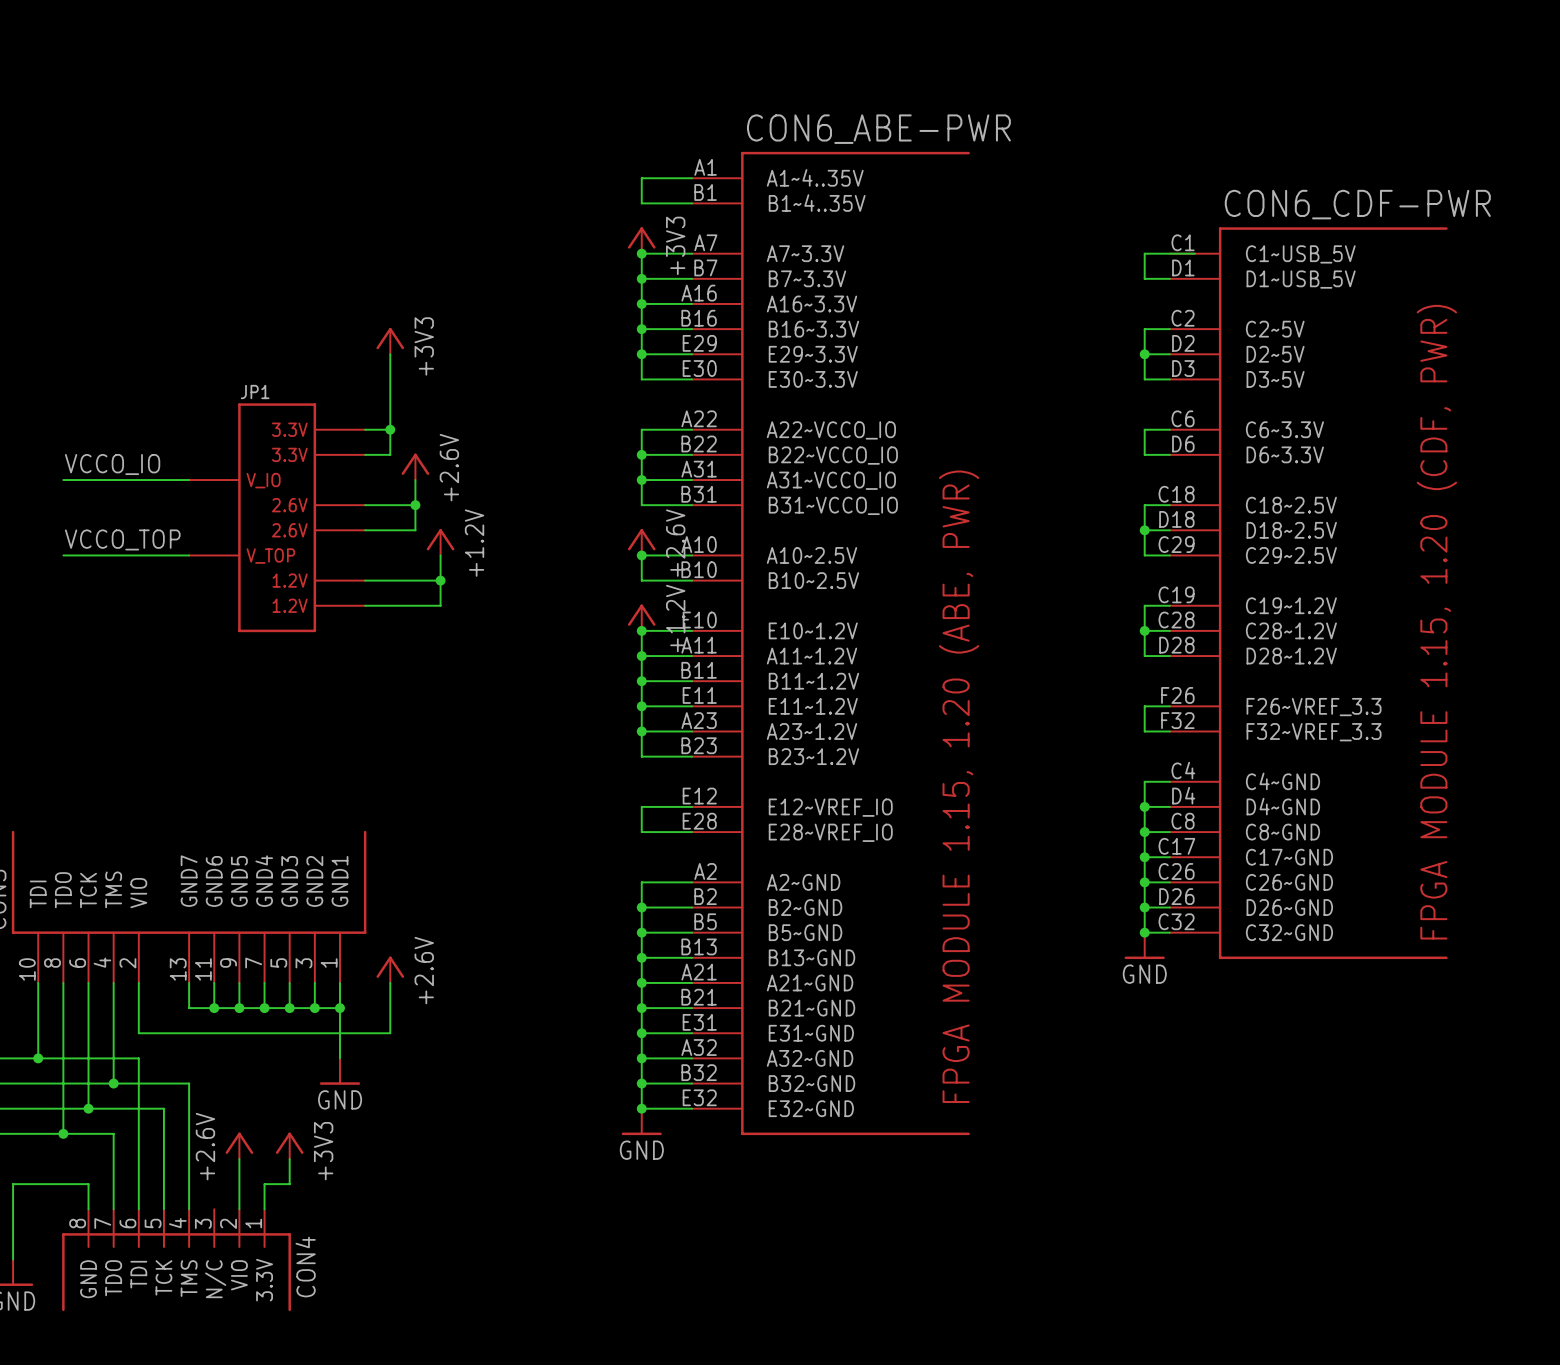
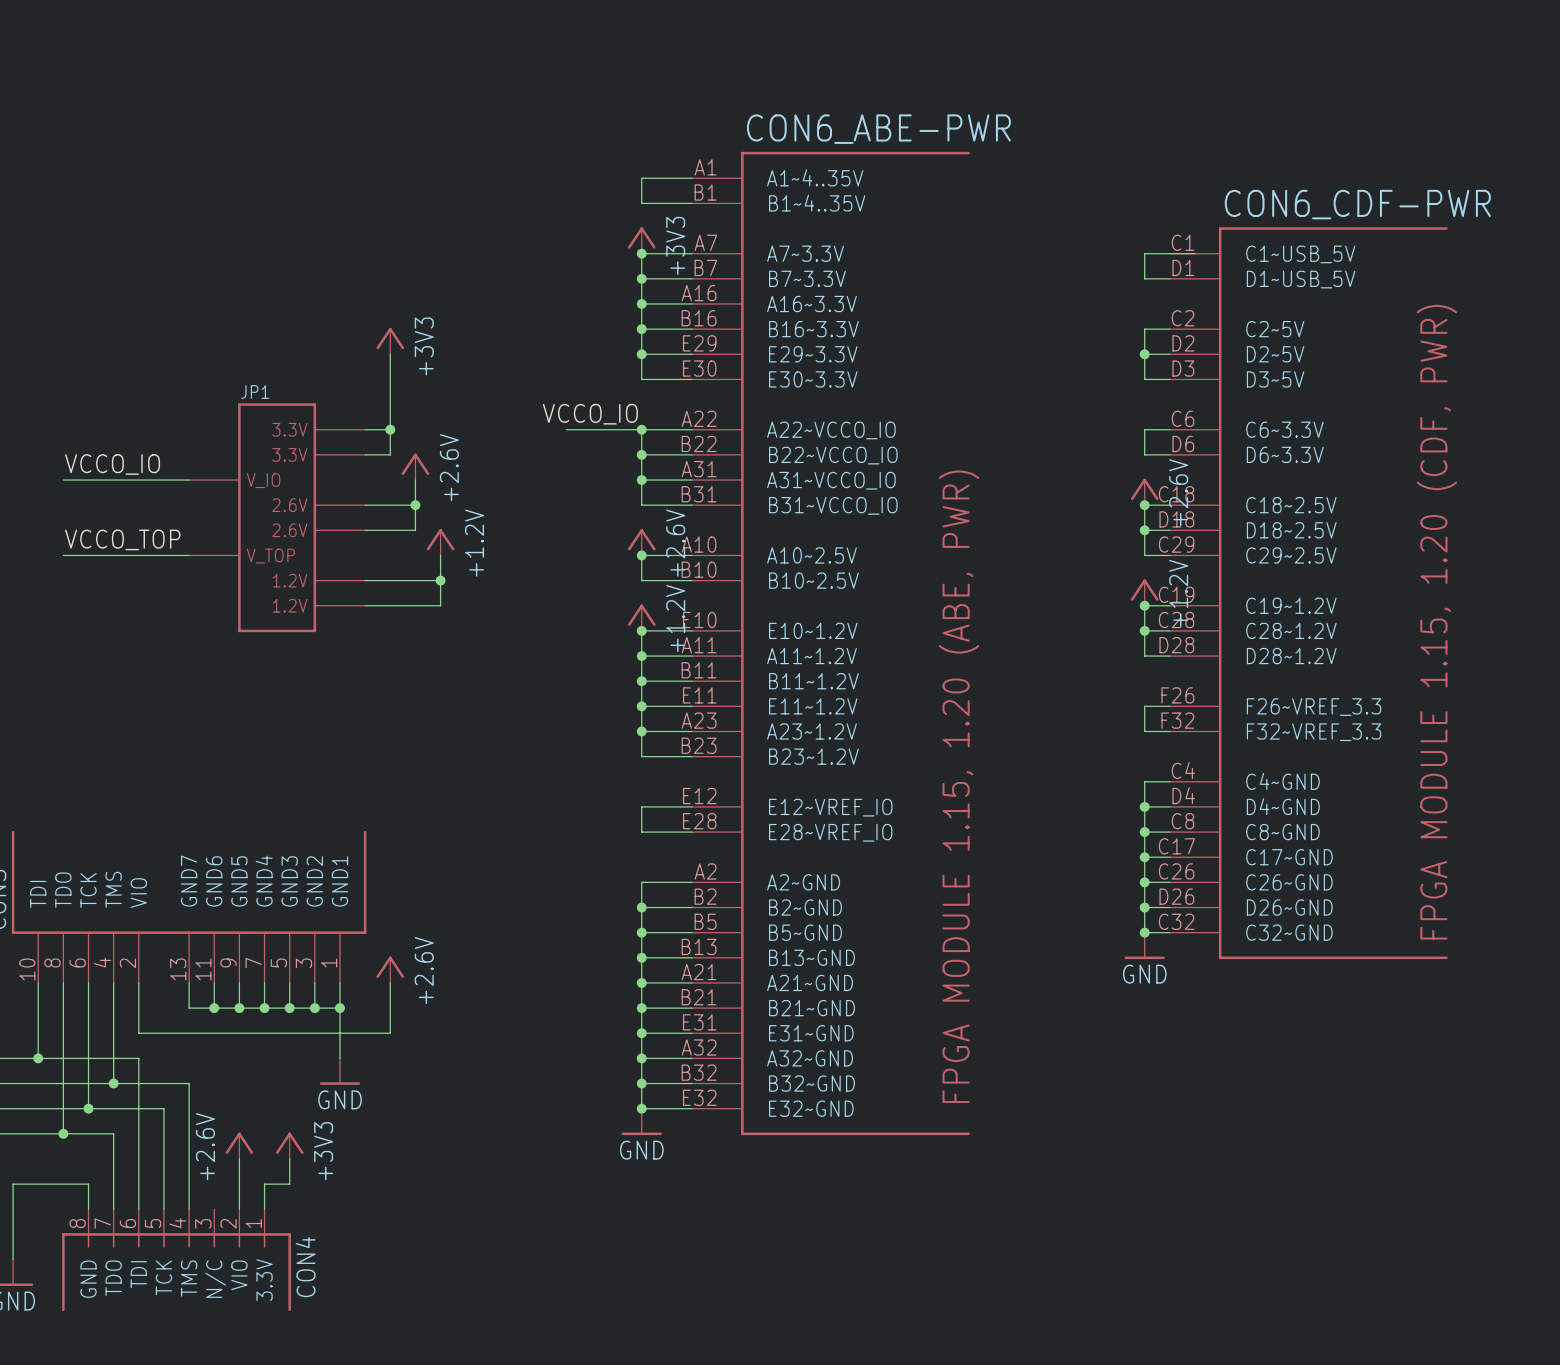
label: none -> VCCO_IO (590, 414)
wire: none -> (566, 429) (641, 429)
junction: none -> (641, 429)
power symbol: none -> +2.6V (1144, 491)
junction: none -> (1144, 505)
power symbol: none -> +1.2V (1144, 592)
junction: none -> (1144, 605)

